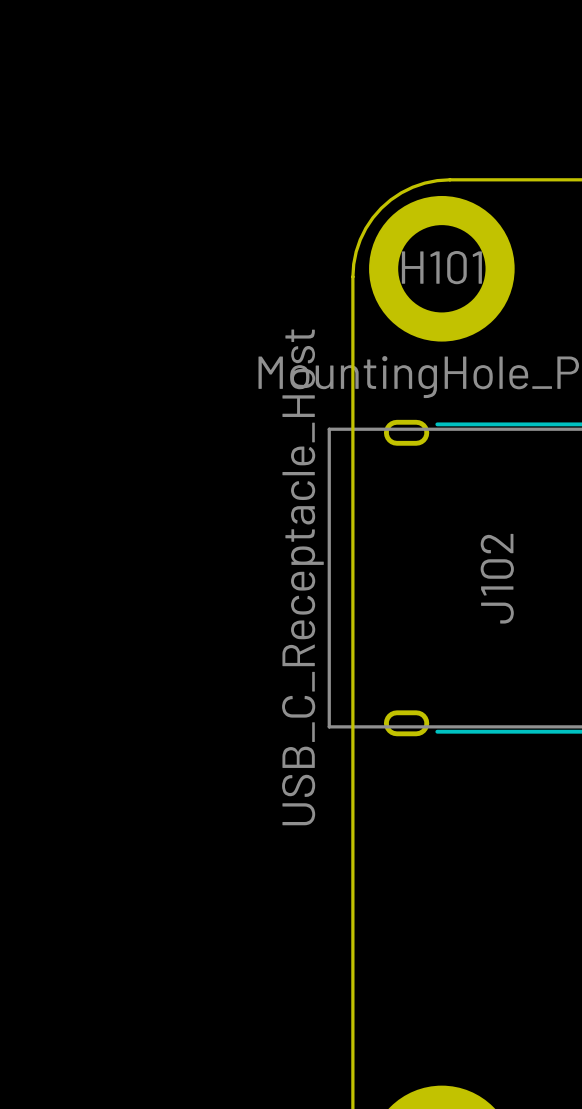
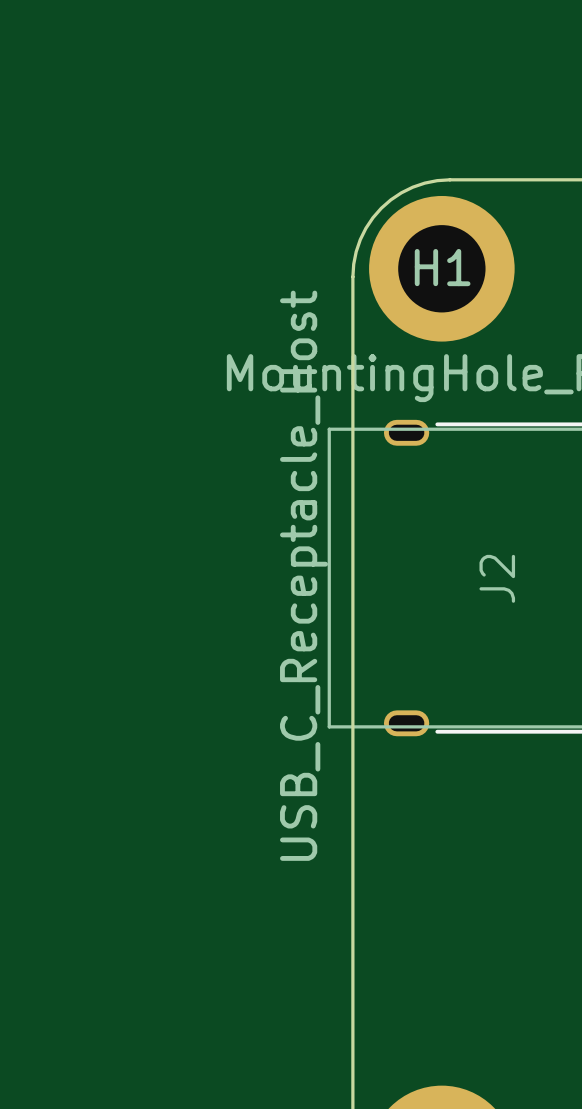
H101 name: H101 (441, 267) -> H1 (442, 267)
J102 name: J102 (497, 578) -> J2 (497, 578)

